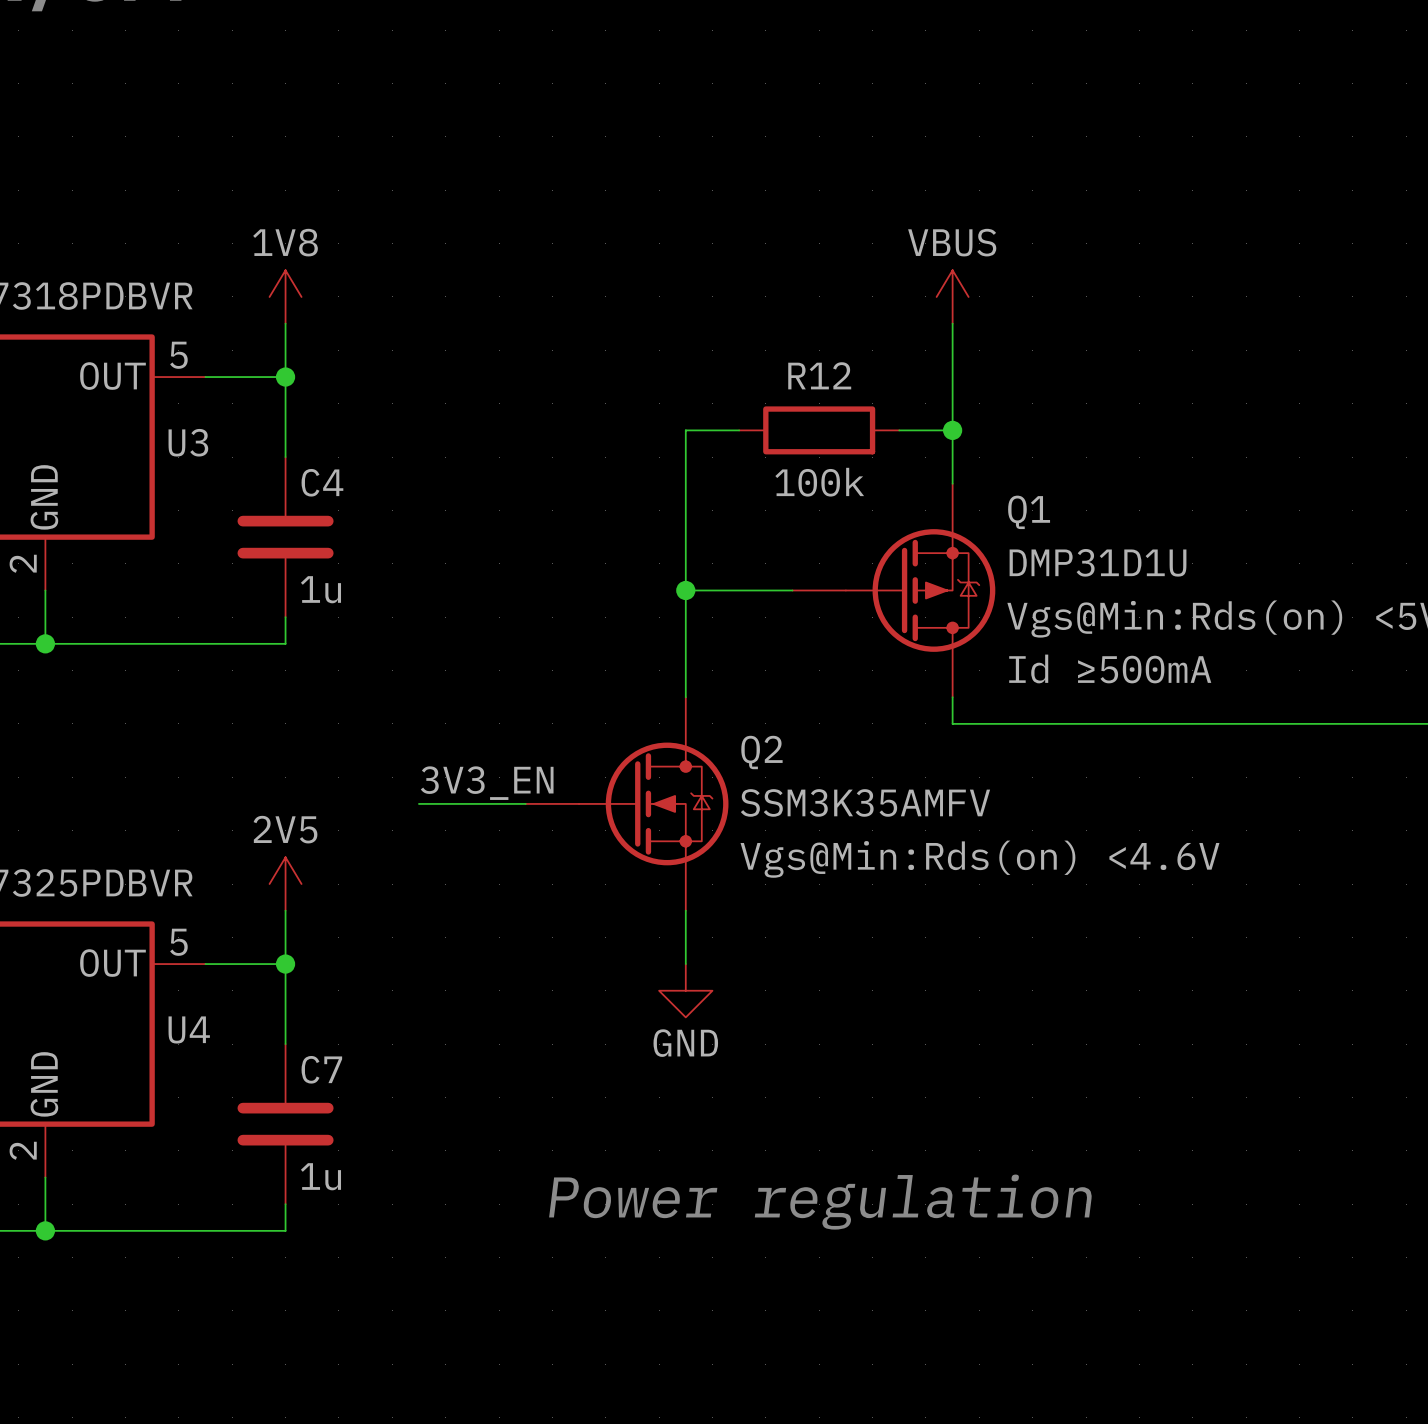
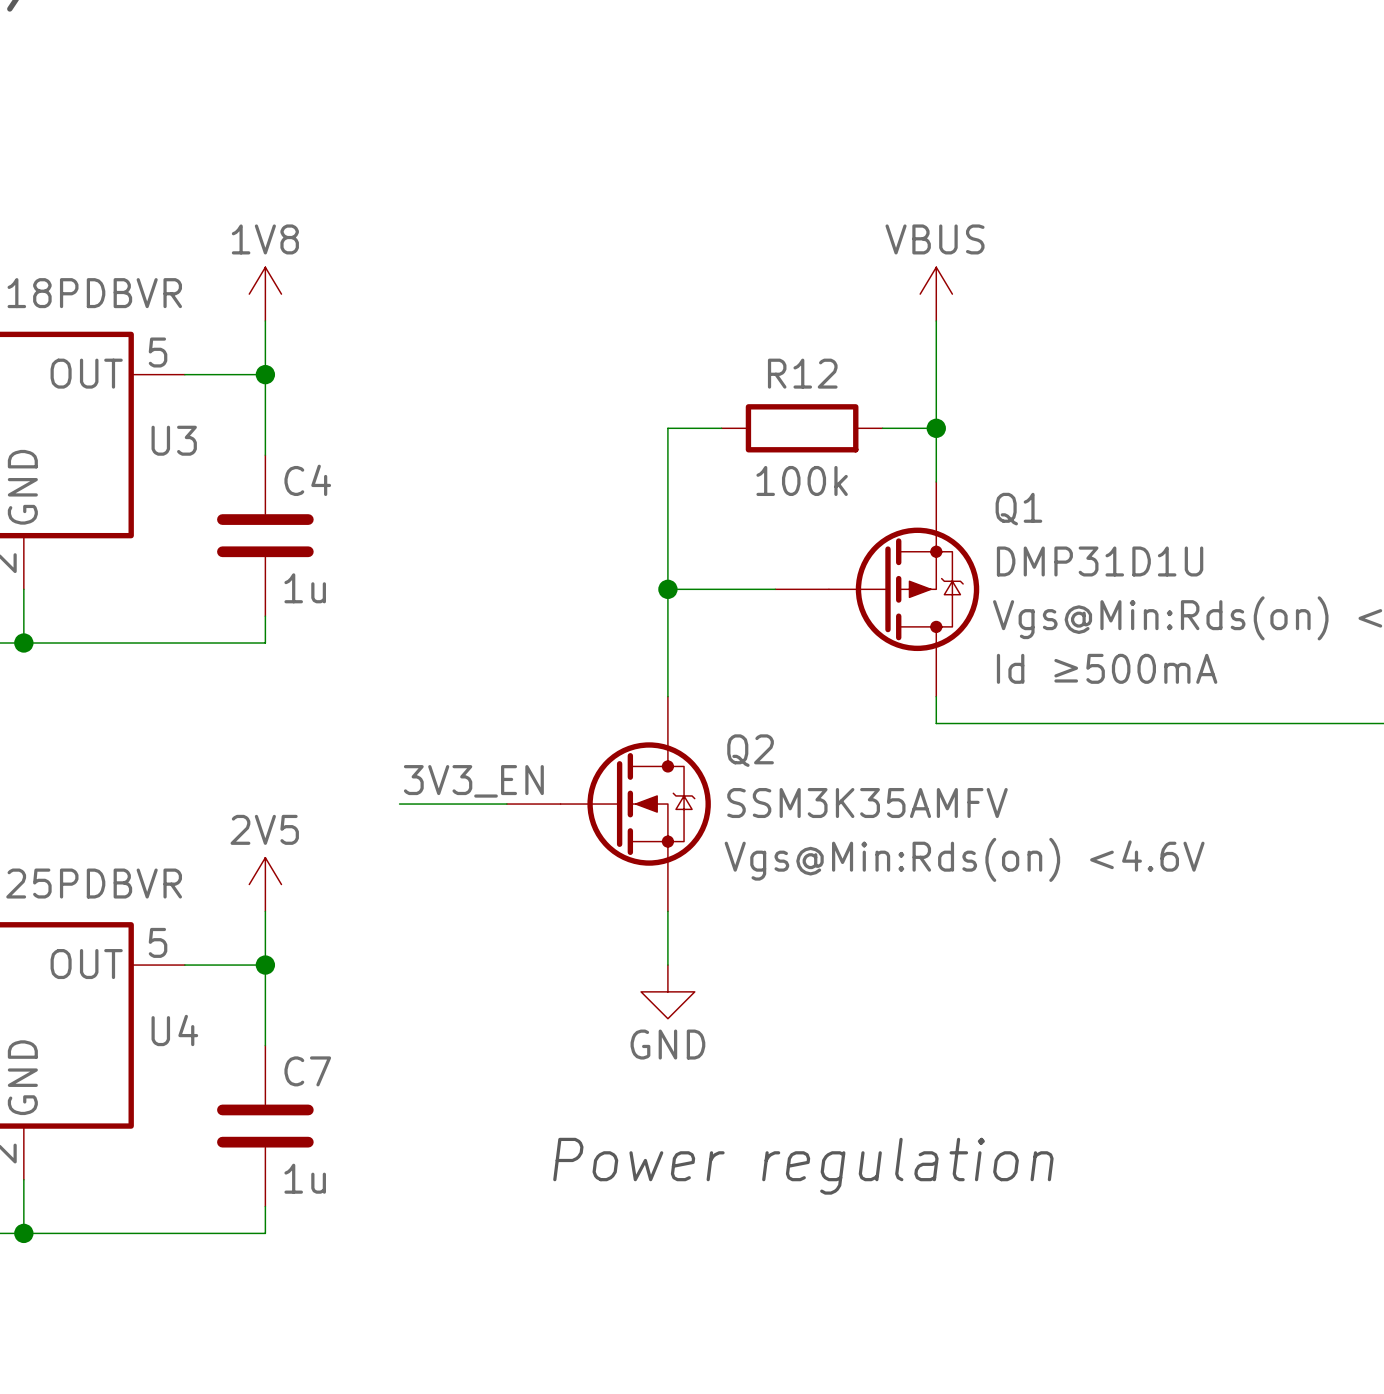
text position: Power regulation (820, 1202) -> Power regulation (803, 1166)

